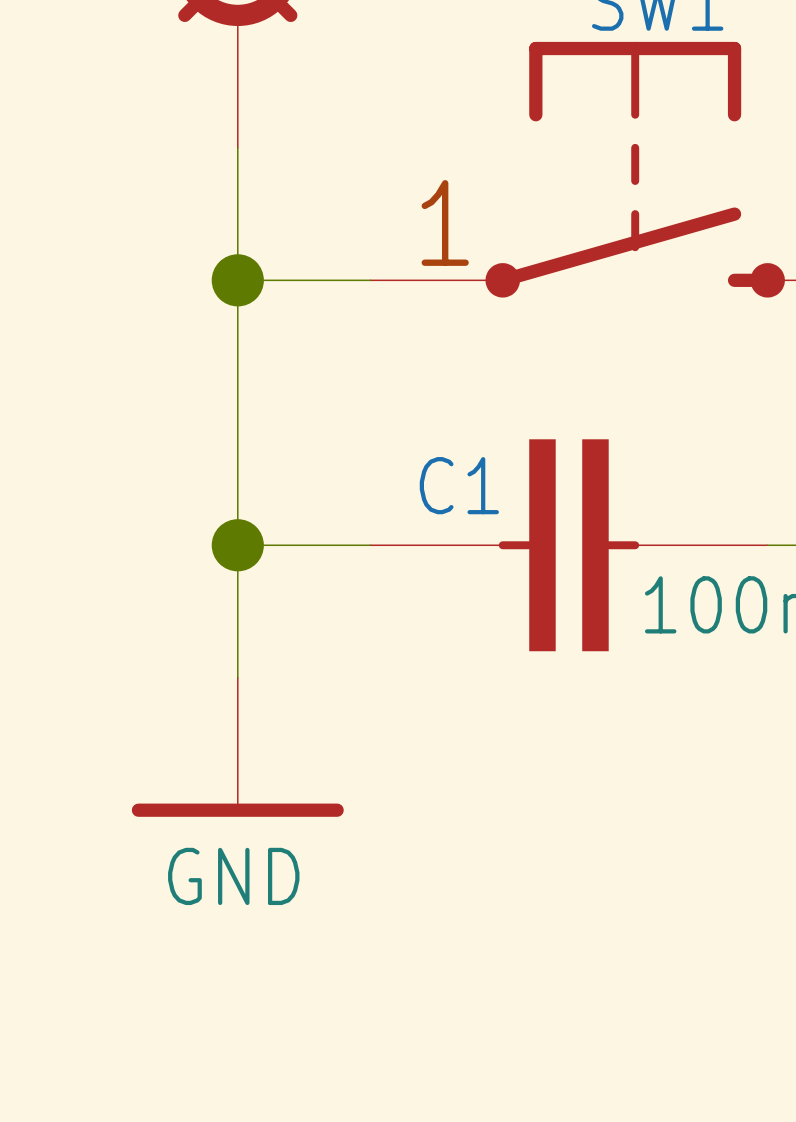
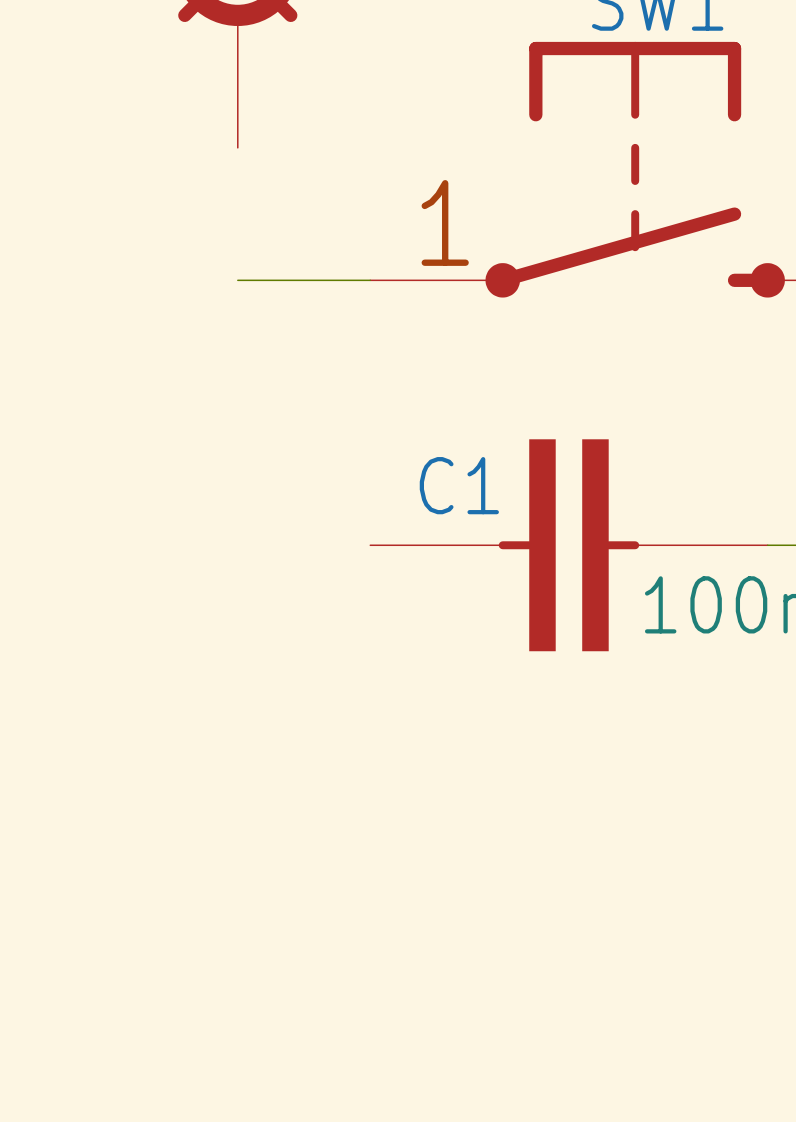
wire: (237, 147) (237, 677) -> none
junction: (237, 280) -> none
wire: (237, 545) (370, 545) -> none
junction: (237, 545) -> none
power symbol: GND (237, 747) -> none

